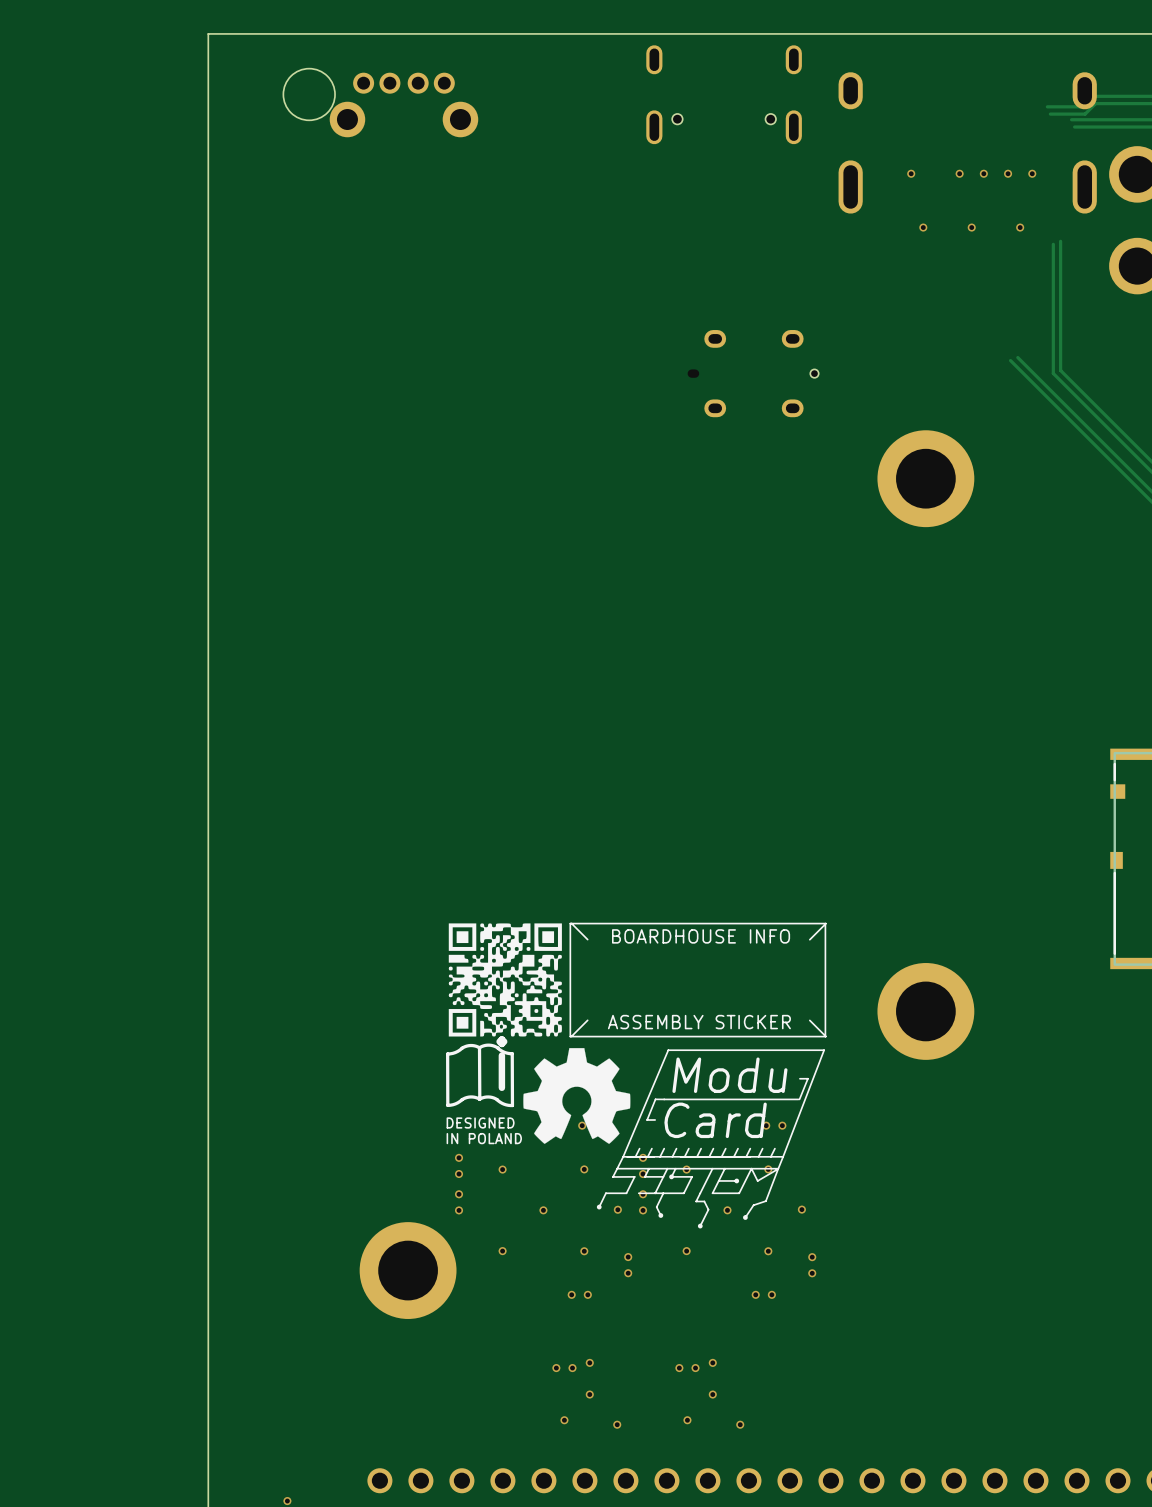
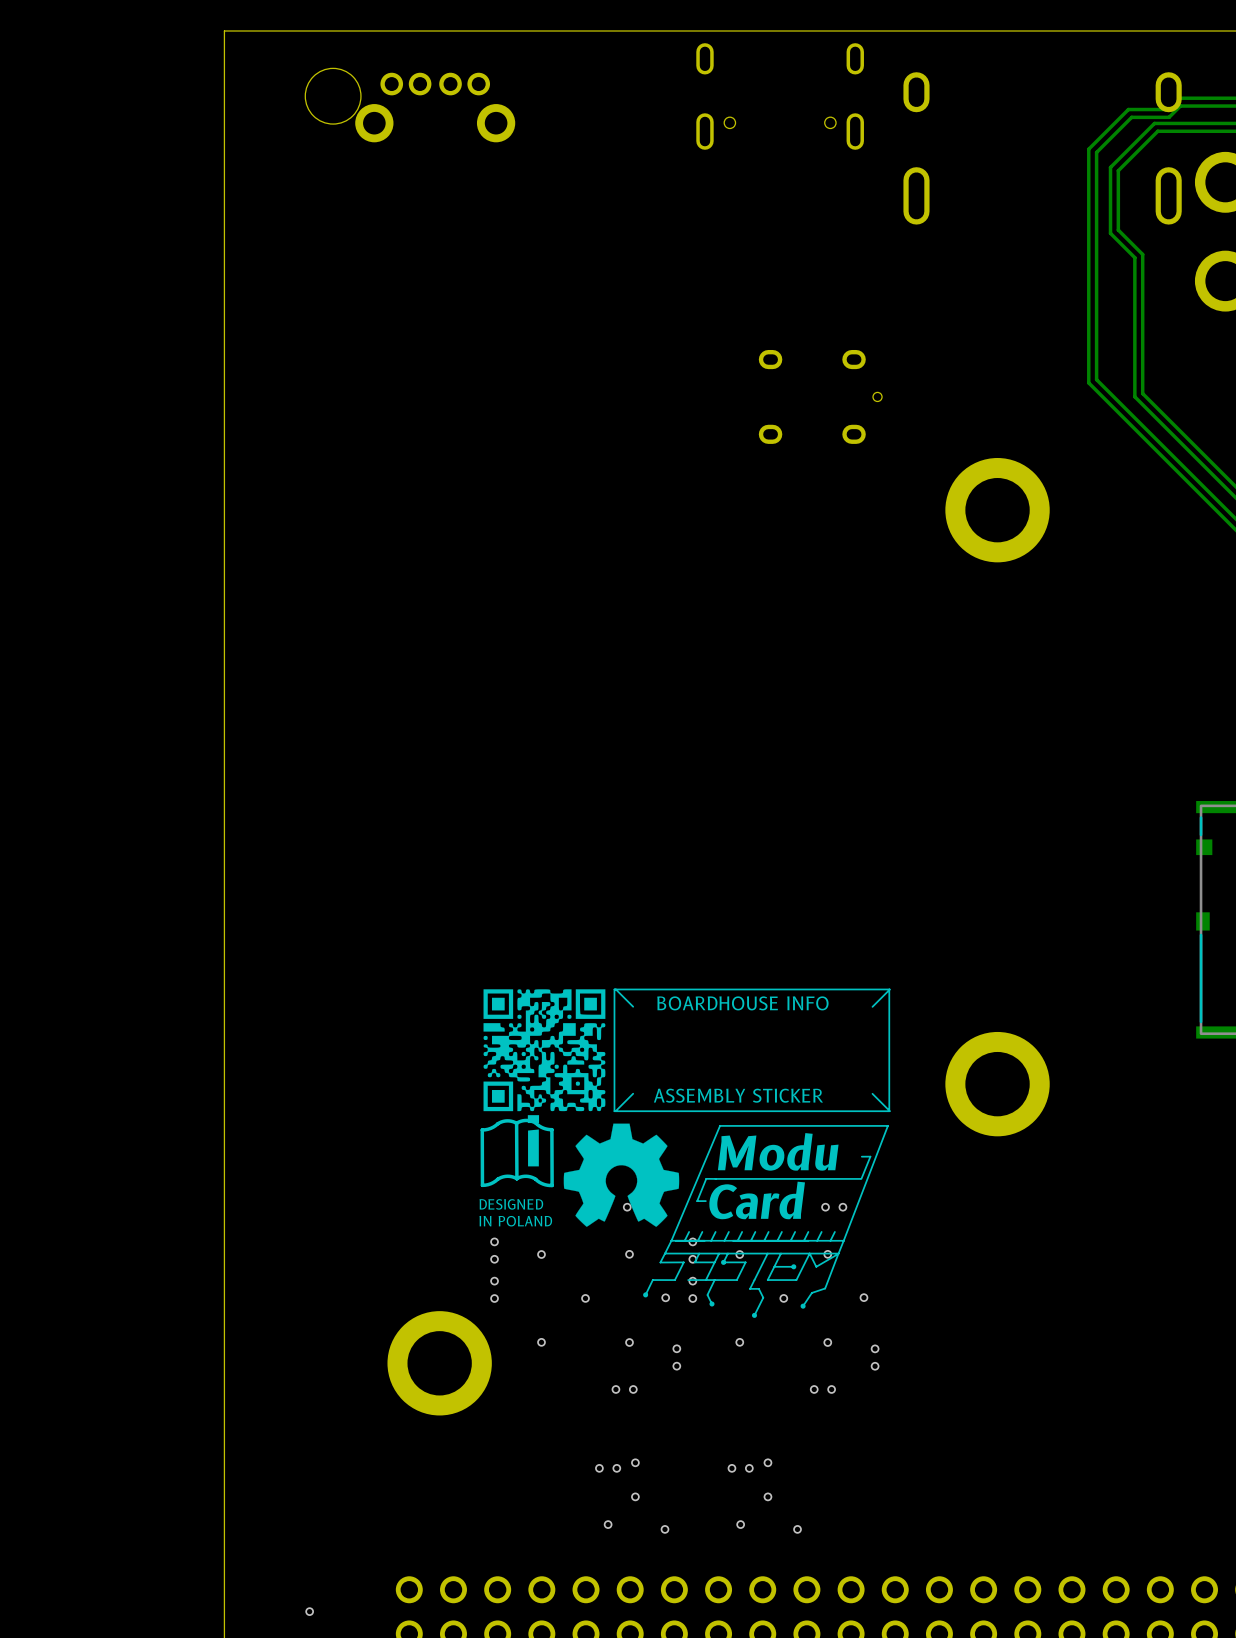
track: none -> (1128, 109) (1088, 149) (1088, 382)
track: none -> (1131, 117) (1096, 152) (1096, 379)
track: none -> (1154, 123) (1110, 167) (1110, 233) (1134, 257)
track: none -> (1157, 131) (1118, 170) (1118, 230) (1142, 254)
via: (911, 173) -> none
via: (959, 173) -> none
via: (983, 173) -> none
via: (1008, 173) -> none
via: (1032, 173) -> none
via: (923, 227) -> none
via: (971, 227) -> none
via: (1020, 227) -> none

